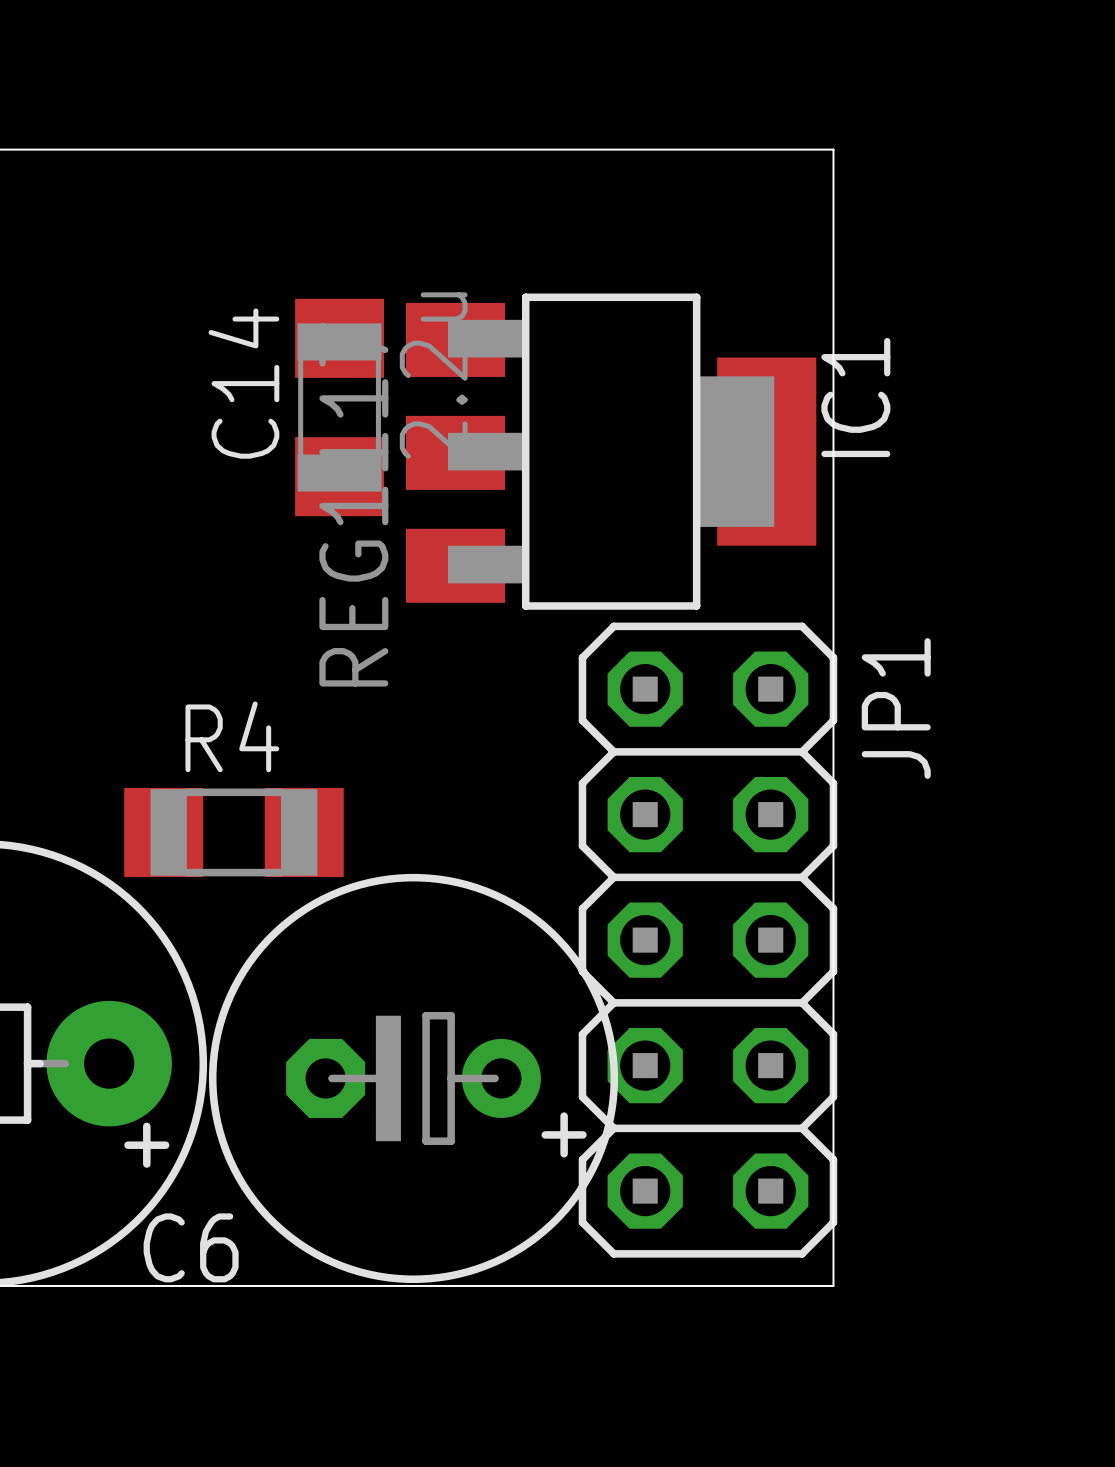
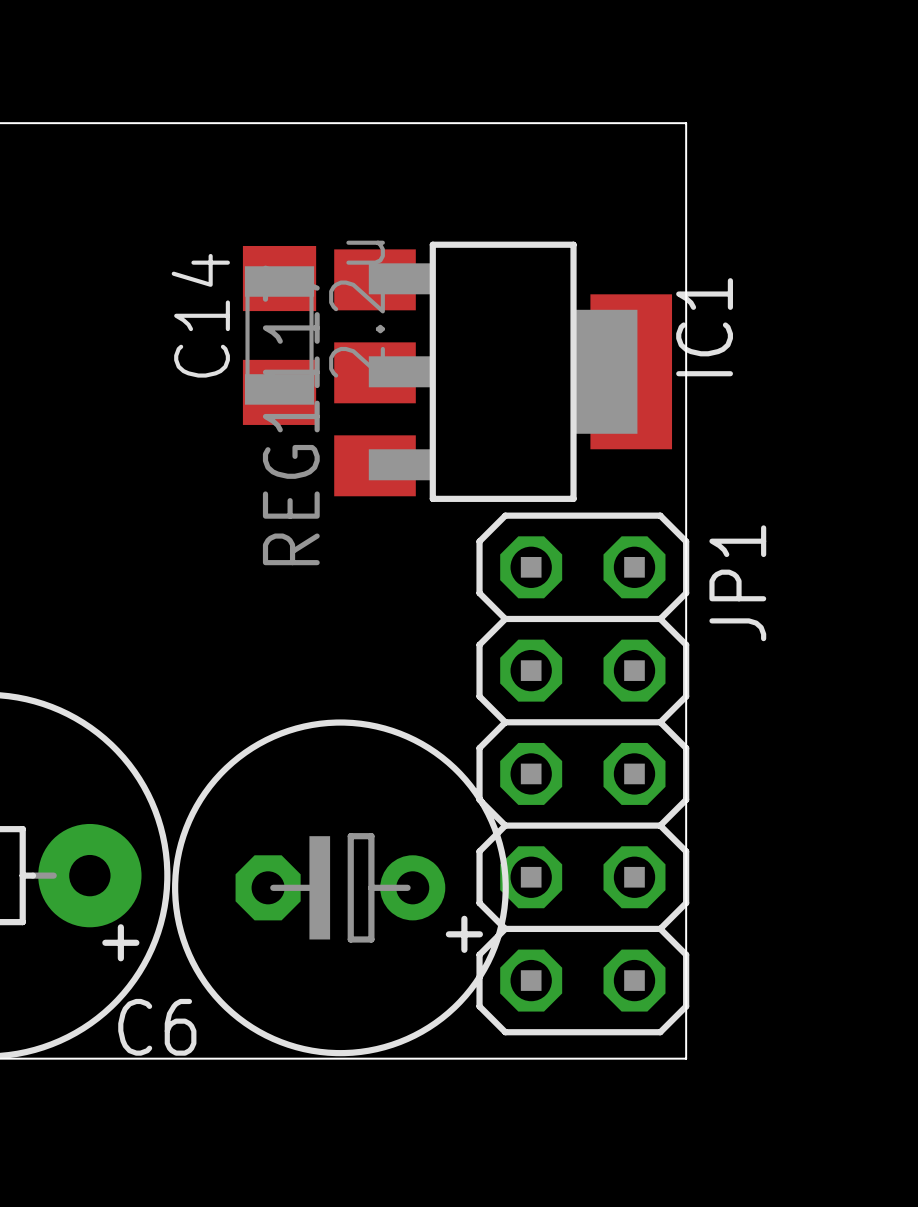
R4: (233, 832) -> none

